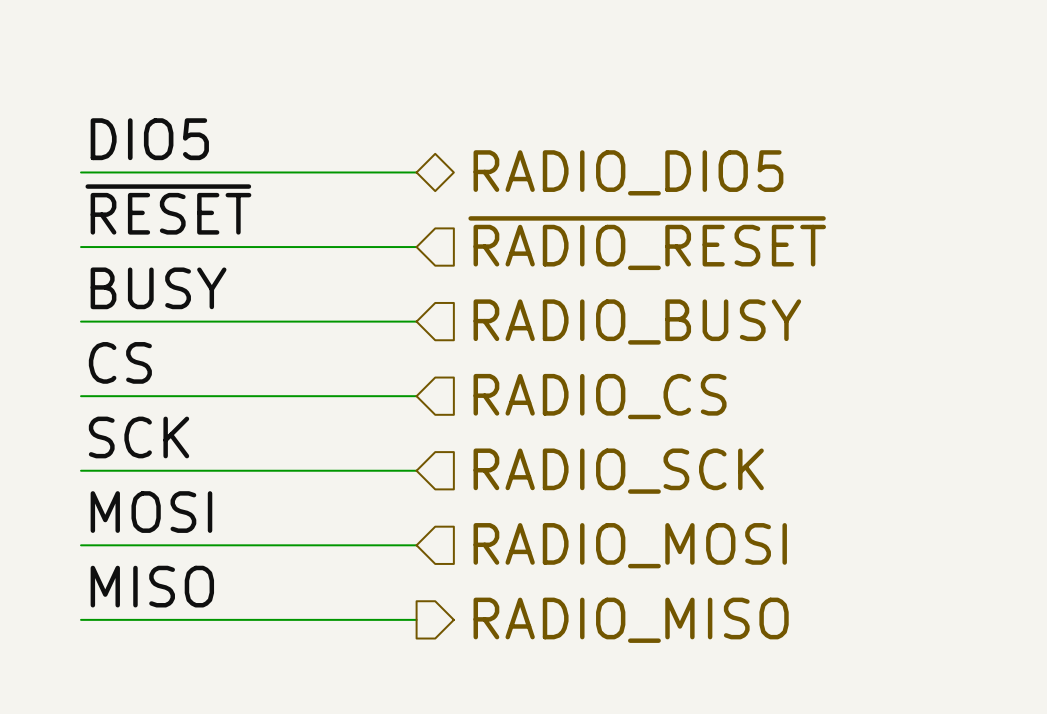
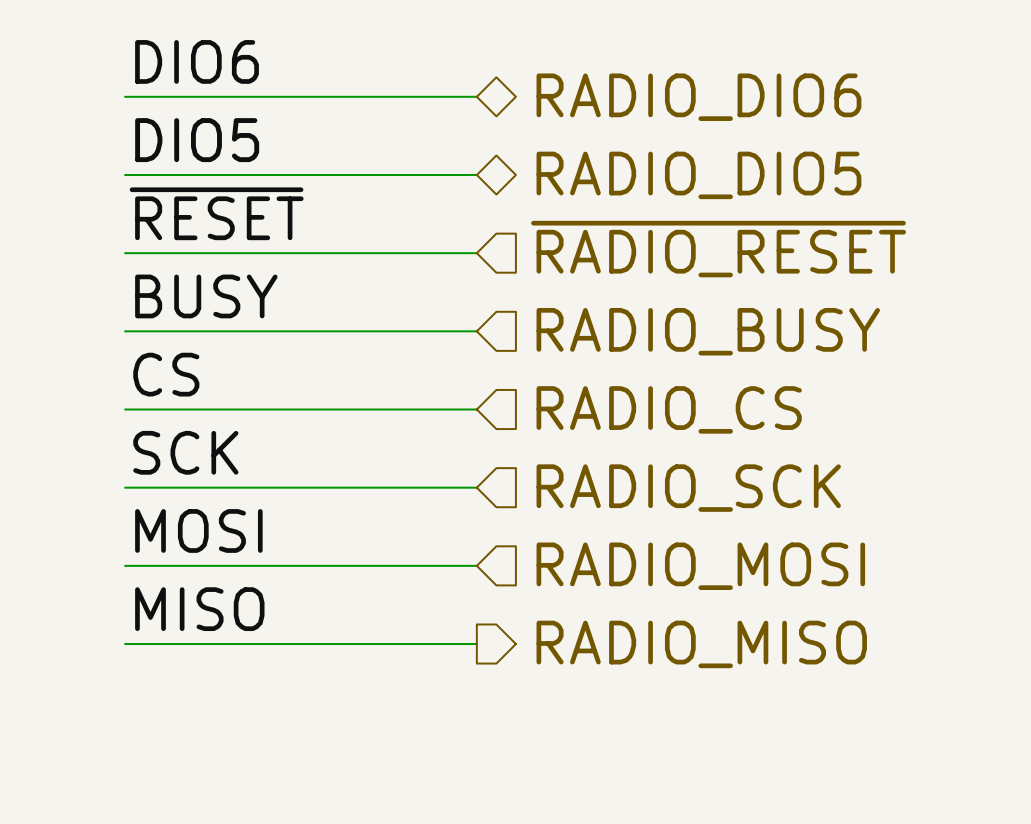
label: none -> DIO6 (197, 61)
wire: none -> (125, 96) (476, 96)
hierarchical label: none -> RADIO_DIO6 (698, 97)

